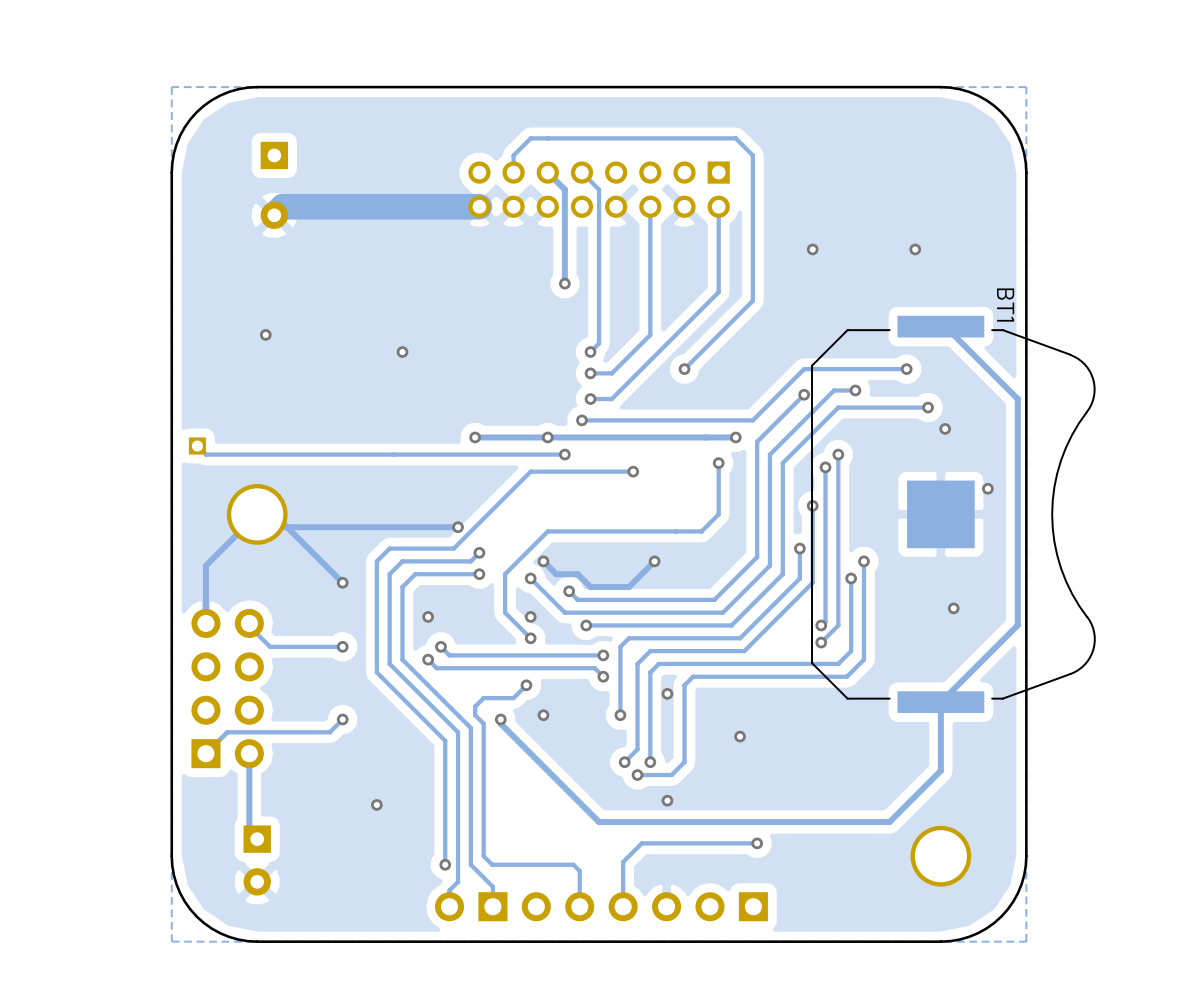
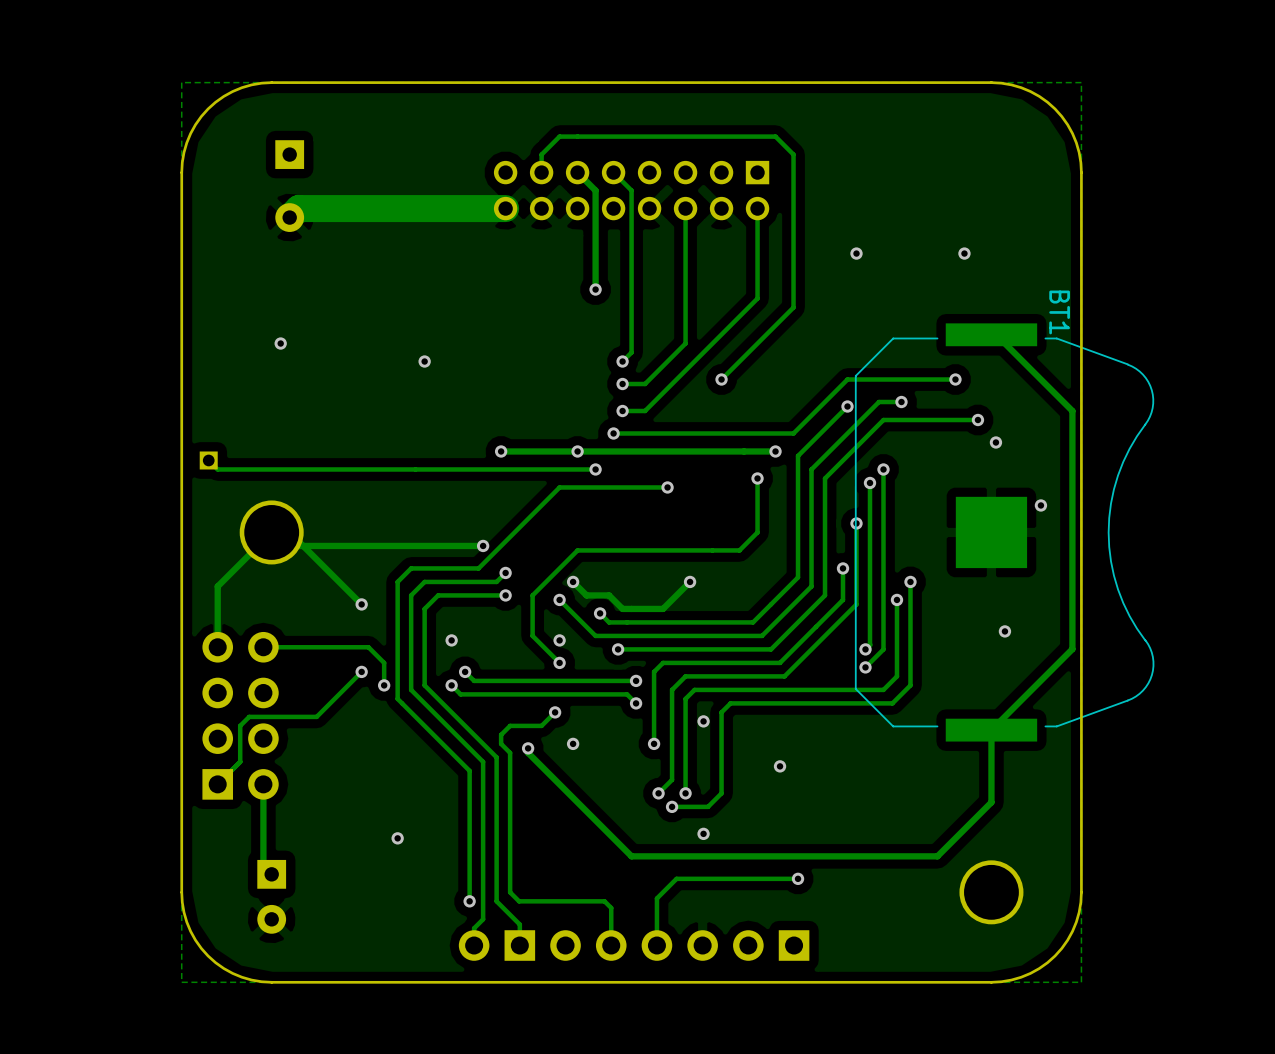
track: none -> (263, 647) (368, 647) (384, 662) (384, 685)
track: (249, 626) (270, 646) (342, 646) -> none
track: (342, 719) (329, 732) (227, 732) -> (361, 671) (316, 716) (249, 716) (240, 725) (240, 761)
via position: (342, 719) -> (384, 685)

